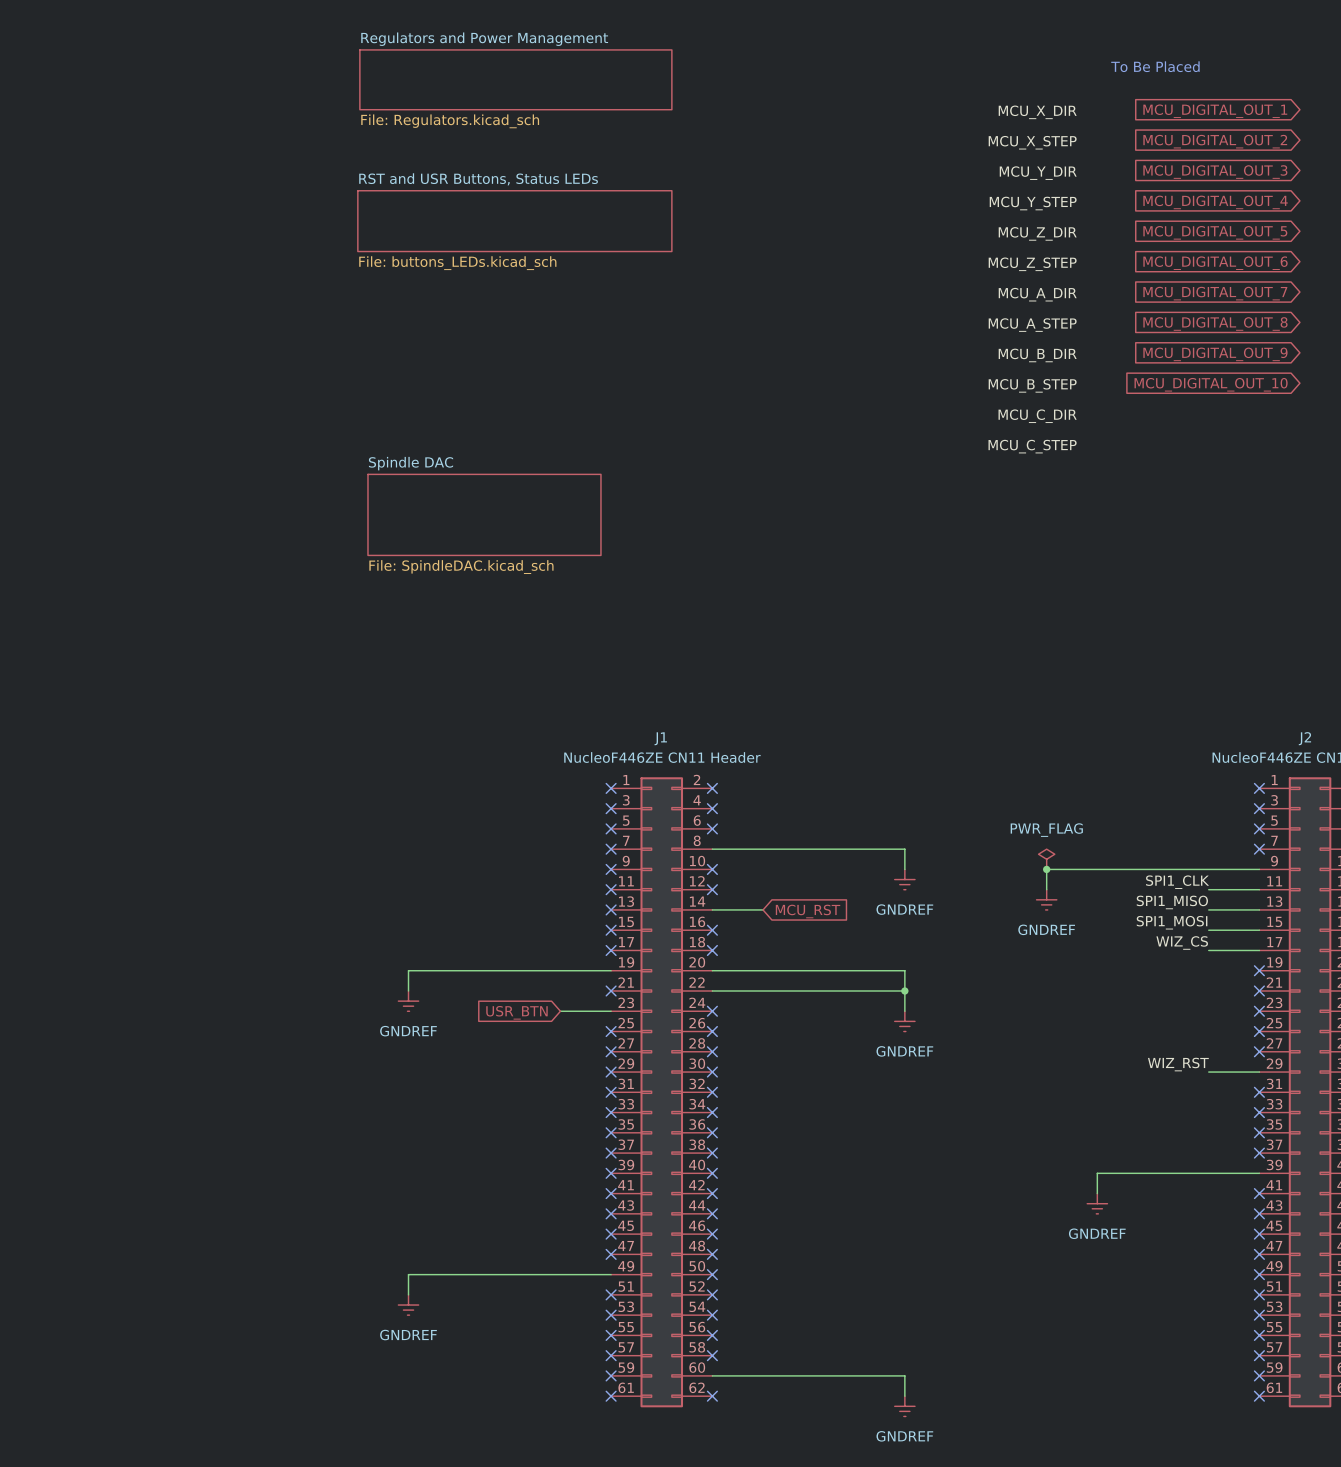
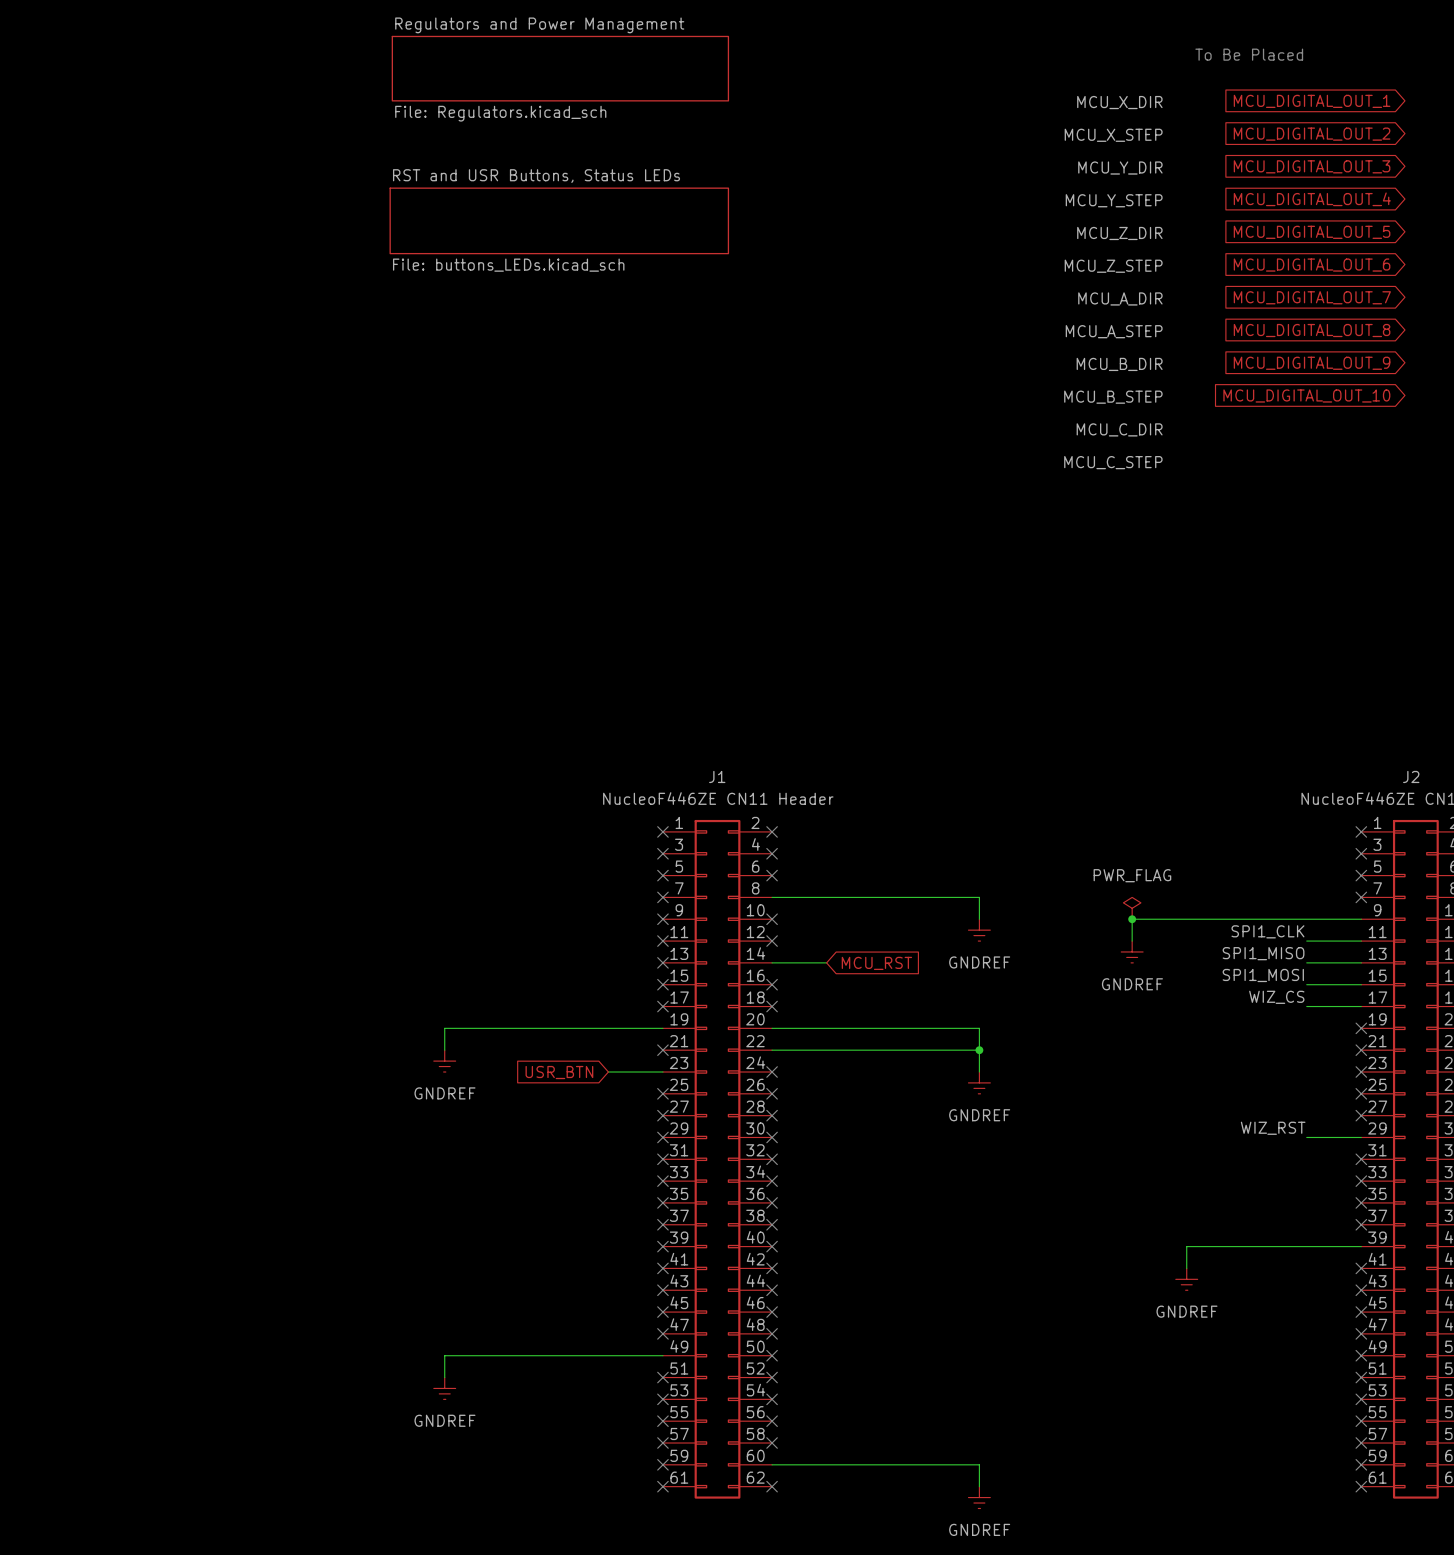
sheet Spindle DAC: File: SpindleDAC.kicad_sch (484, 514) -> none

